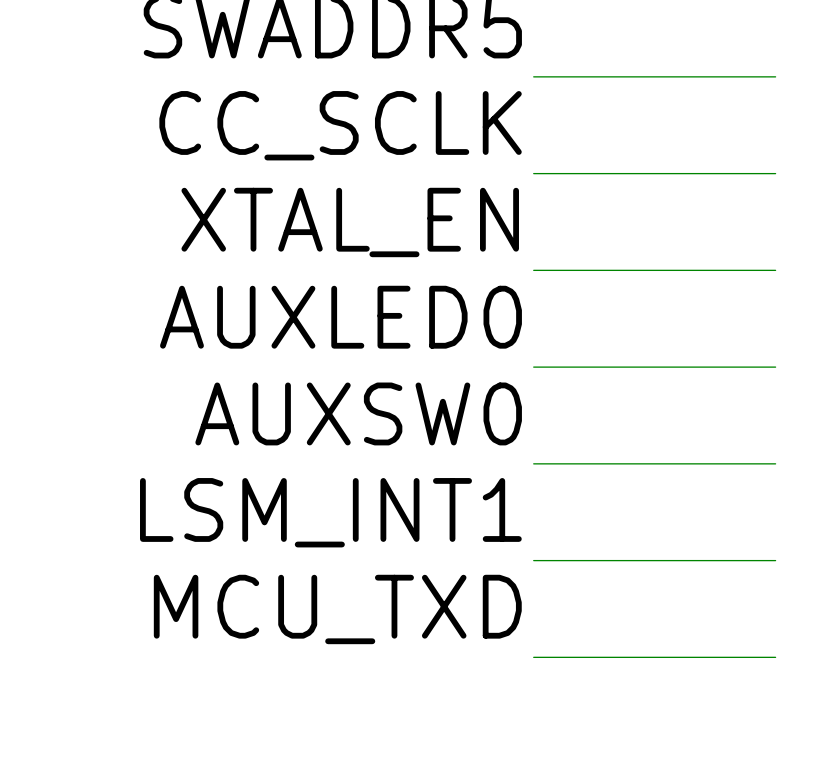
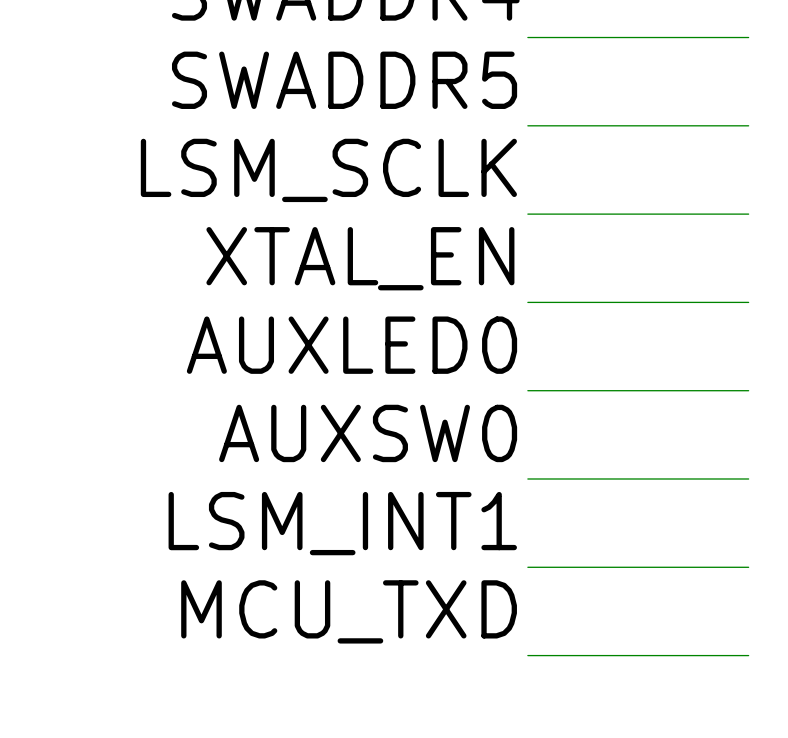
label: CC_SCLK (340, 125) -> LSM_SCLK (328, 170)

